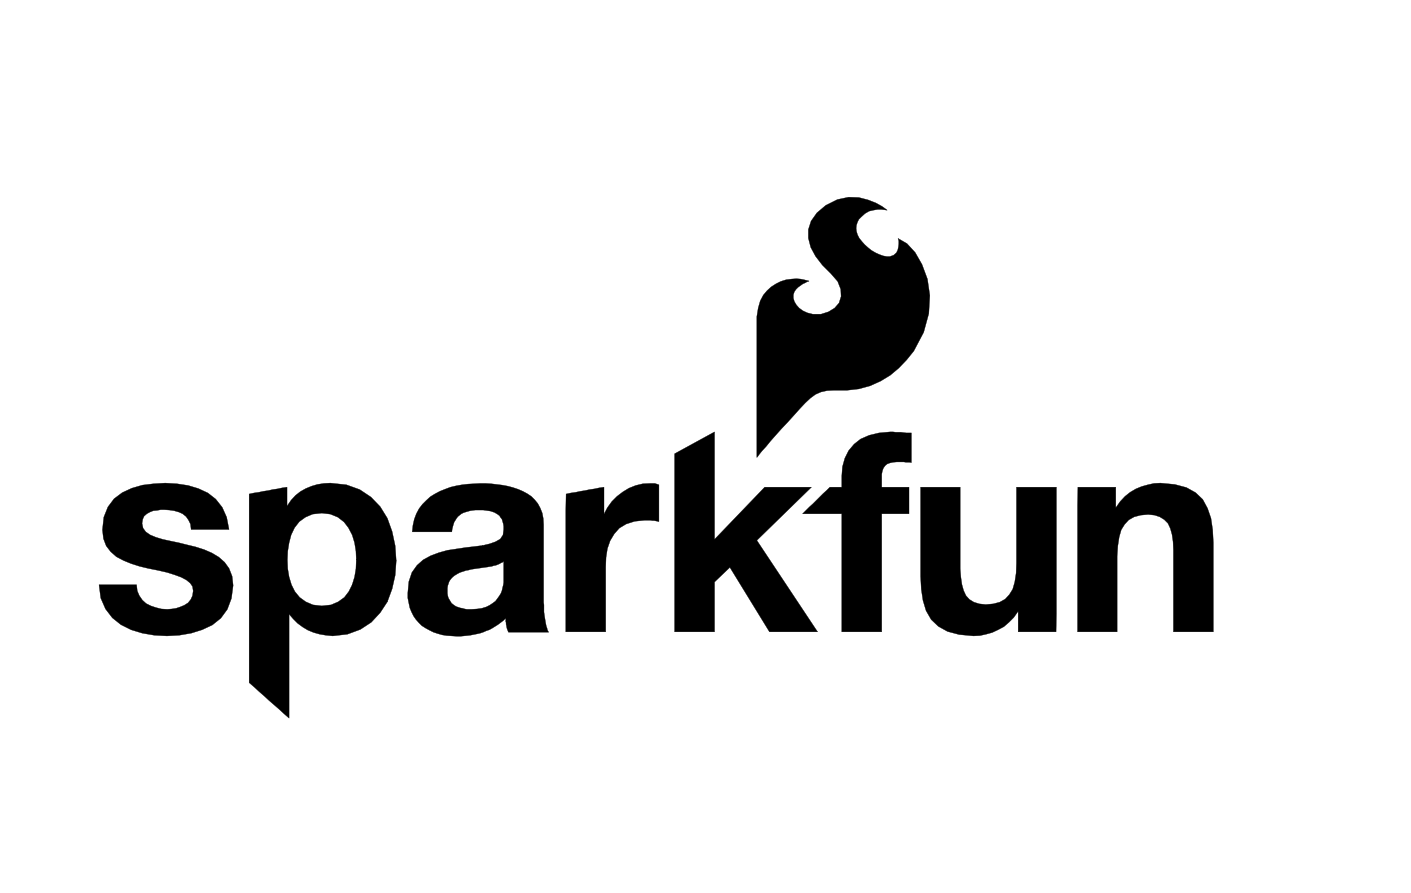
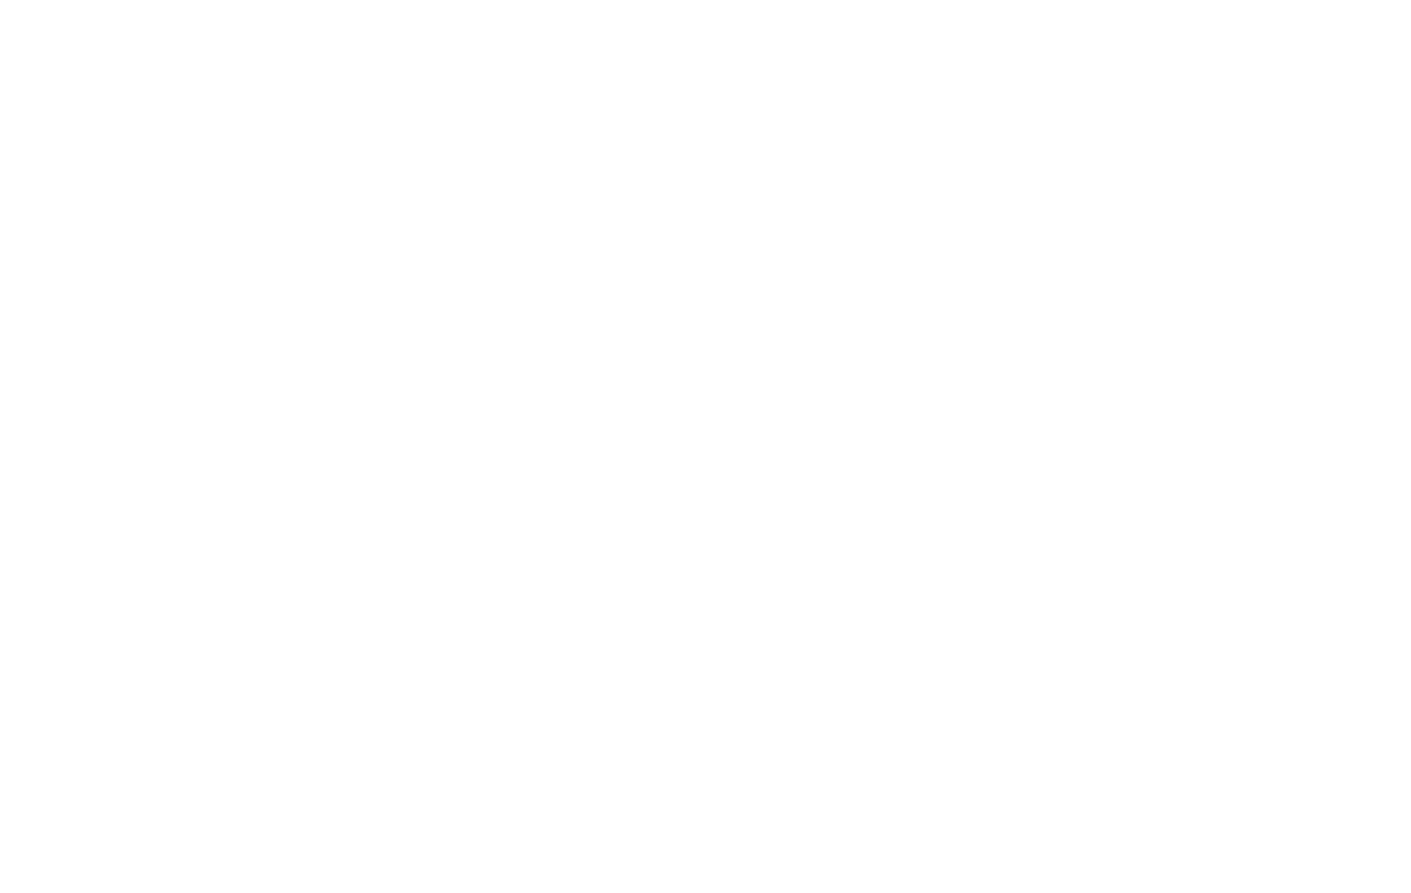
drawing: [98, 196, 1214, 719] -> none

